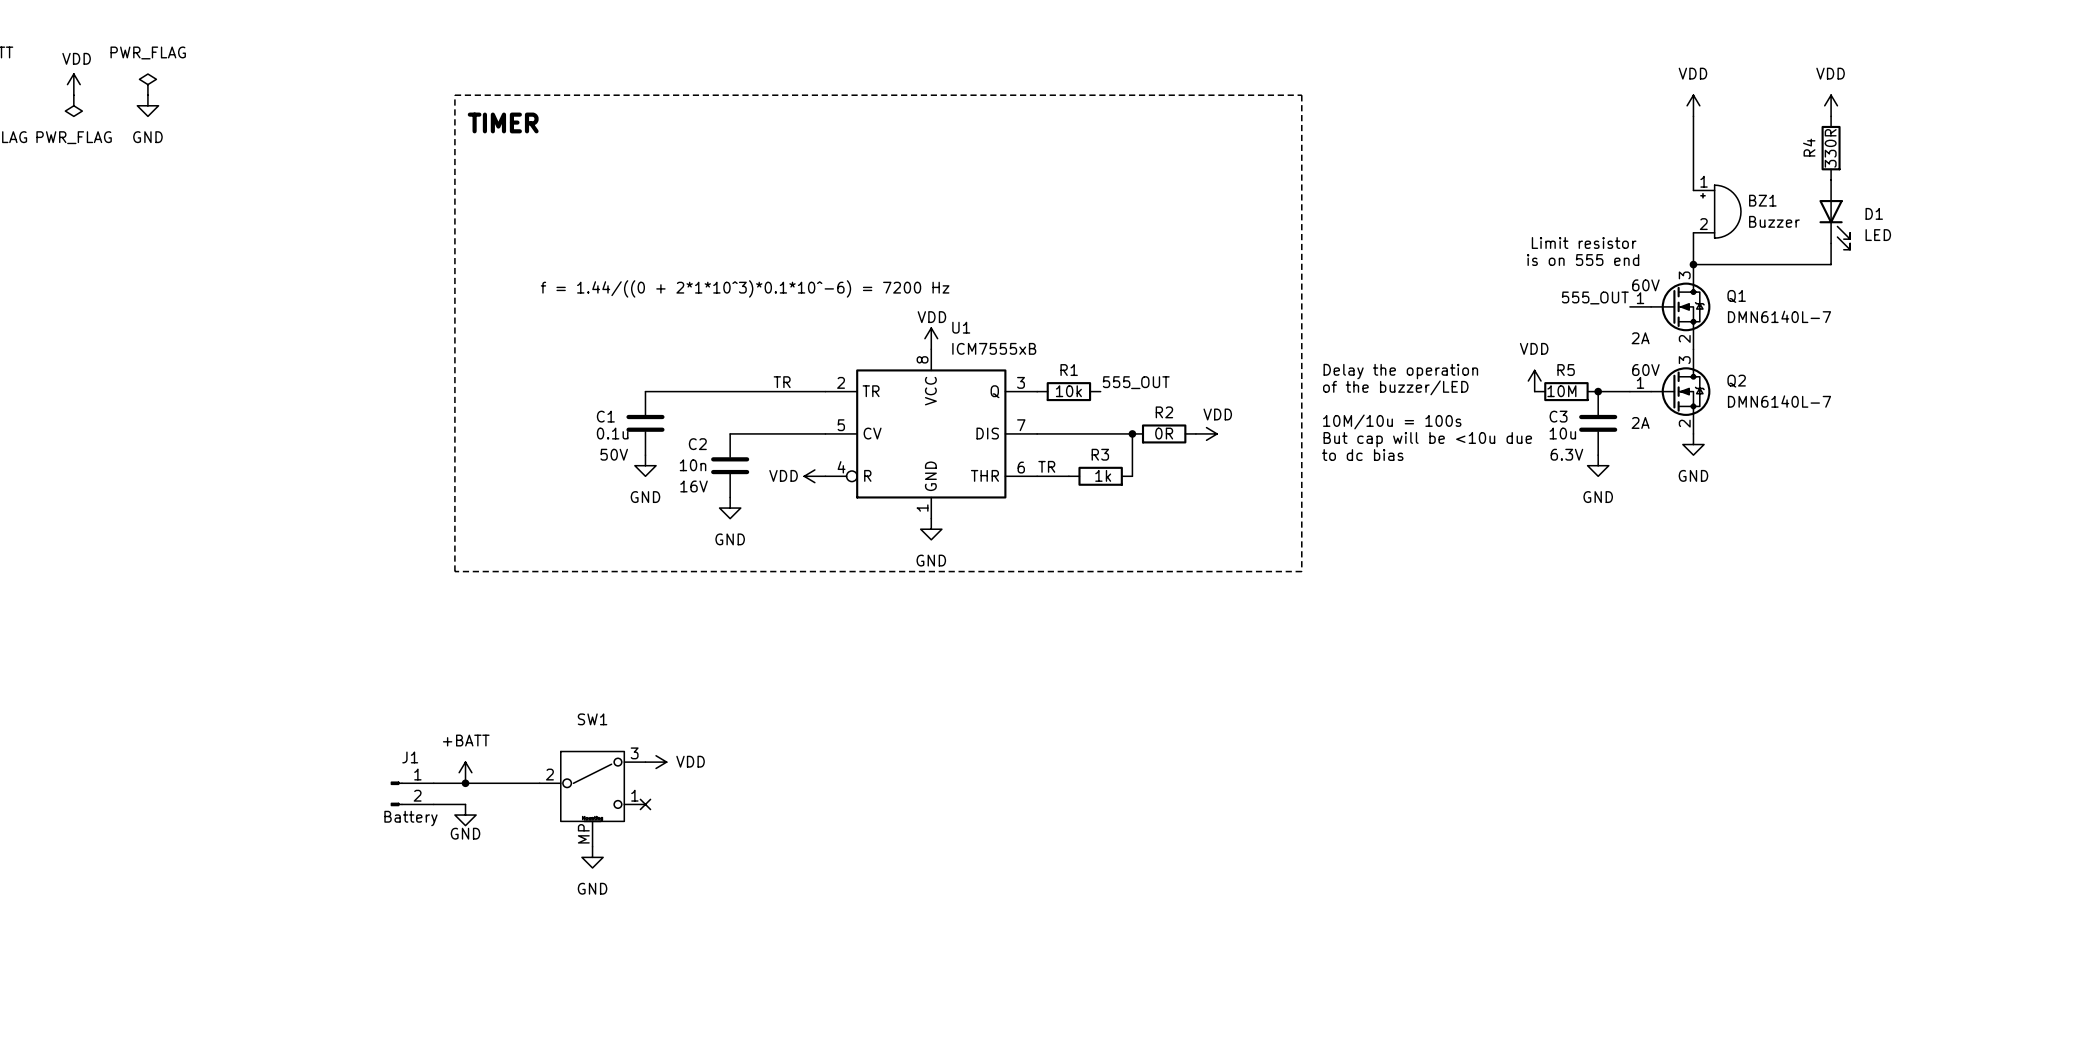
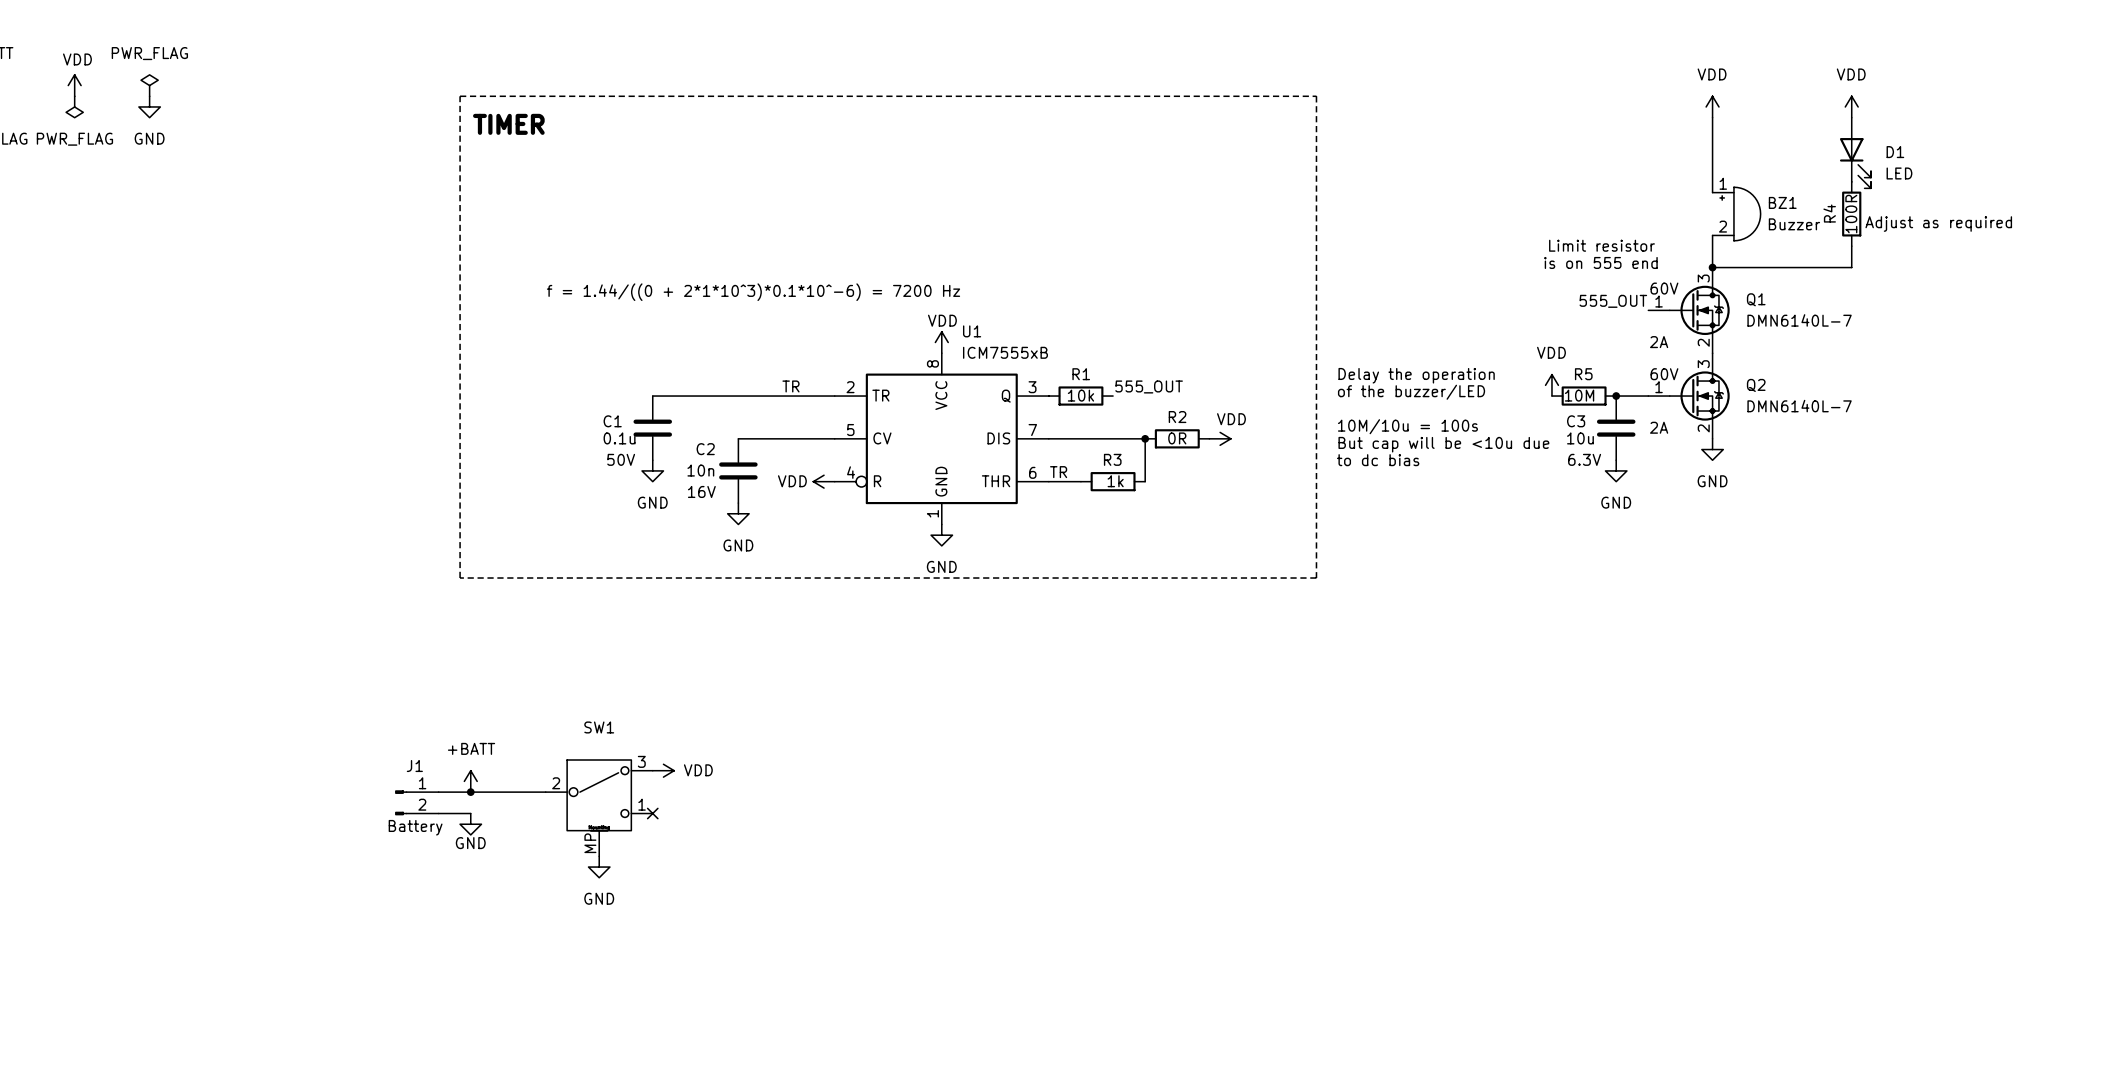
R4 value: 330R (1830, 148) -> 100R (1851, 214)
R4 position: (1831, 148) -> (1851, 214)
D1 position: (1834, 214) -> (1855, 153)
text: none -> Adjust as required (1938, 224)

